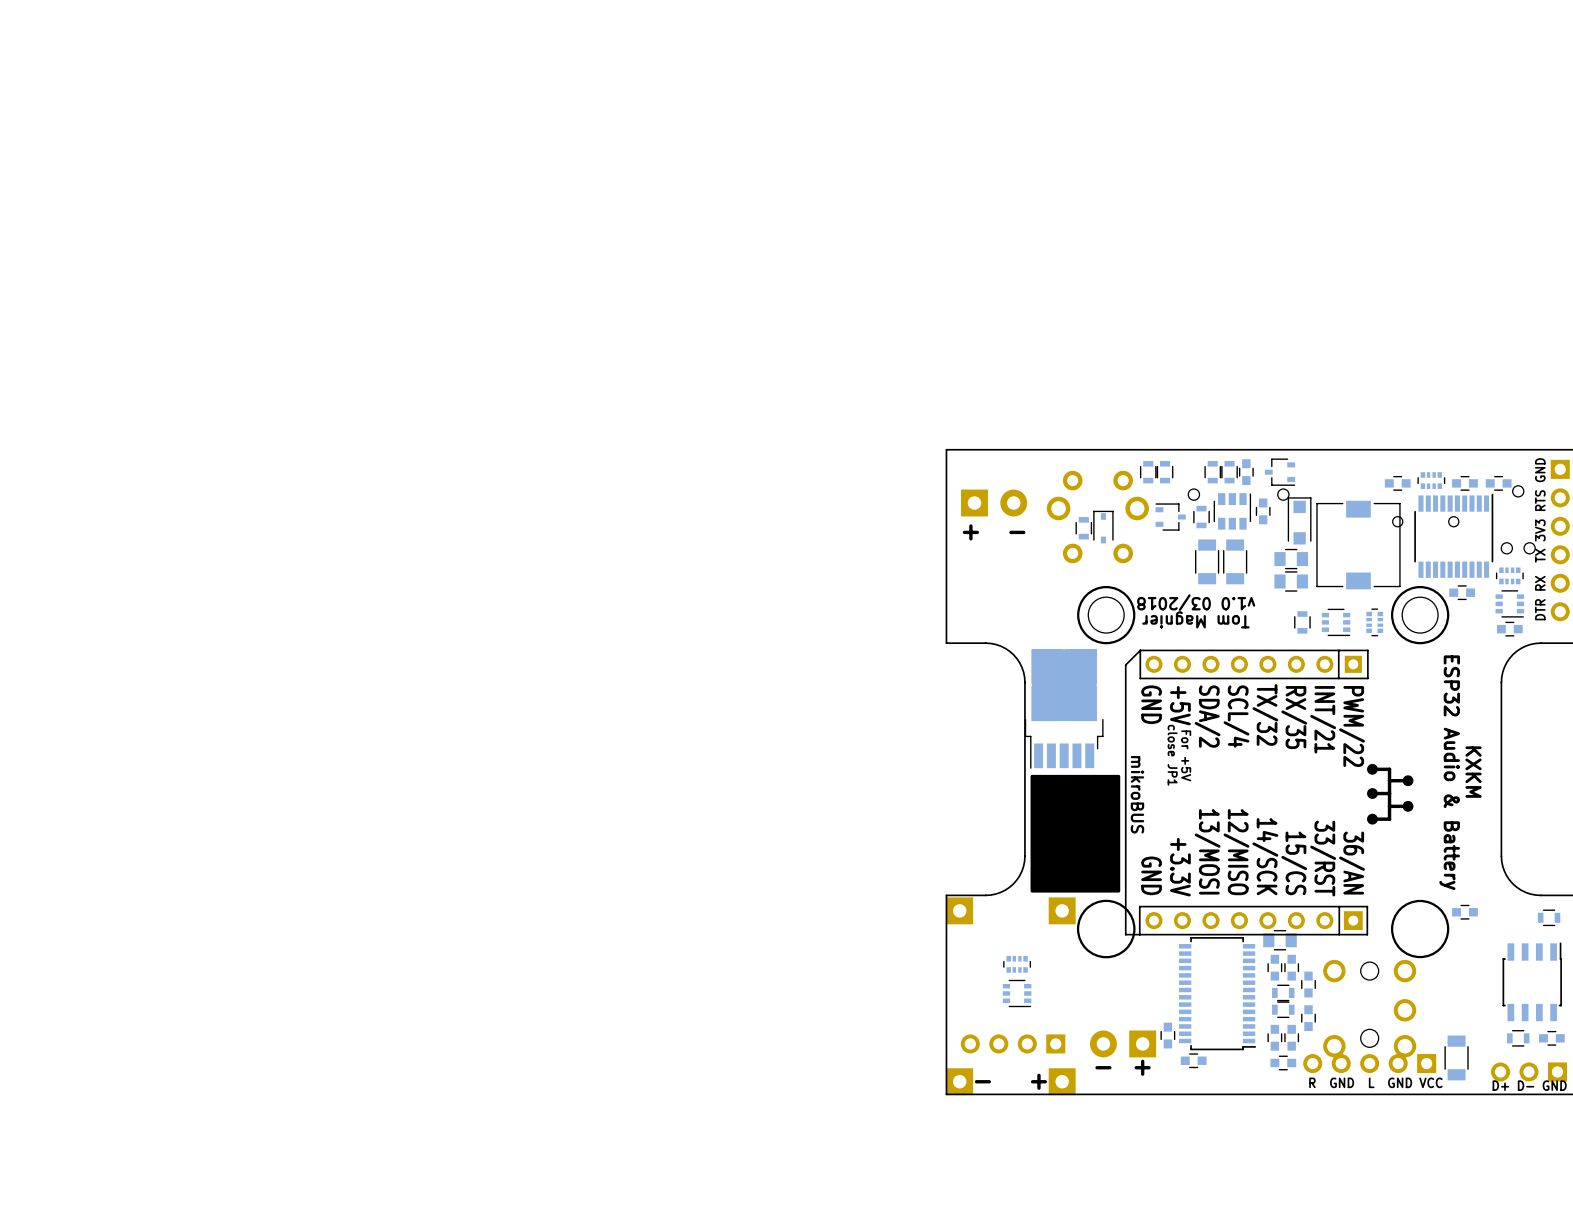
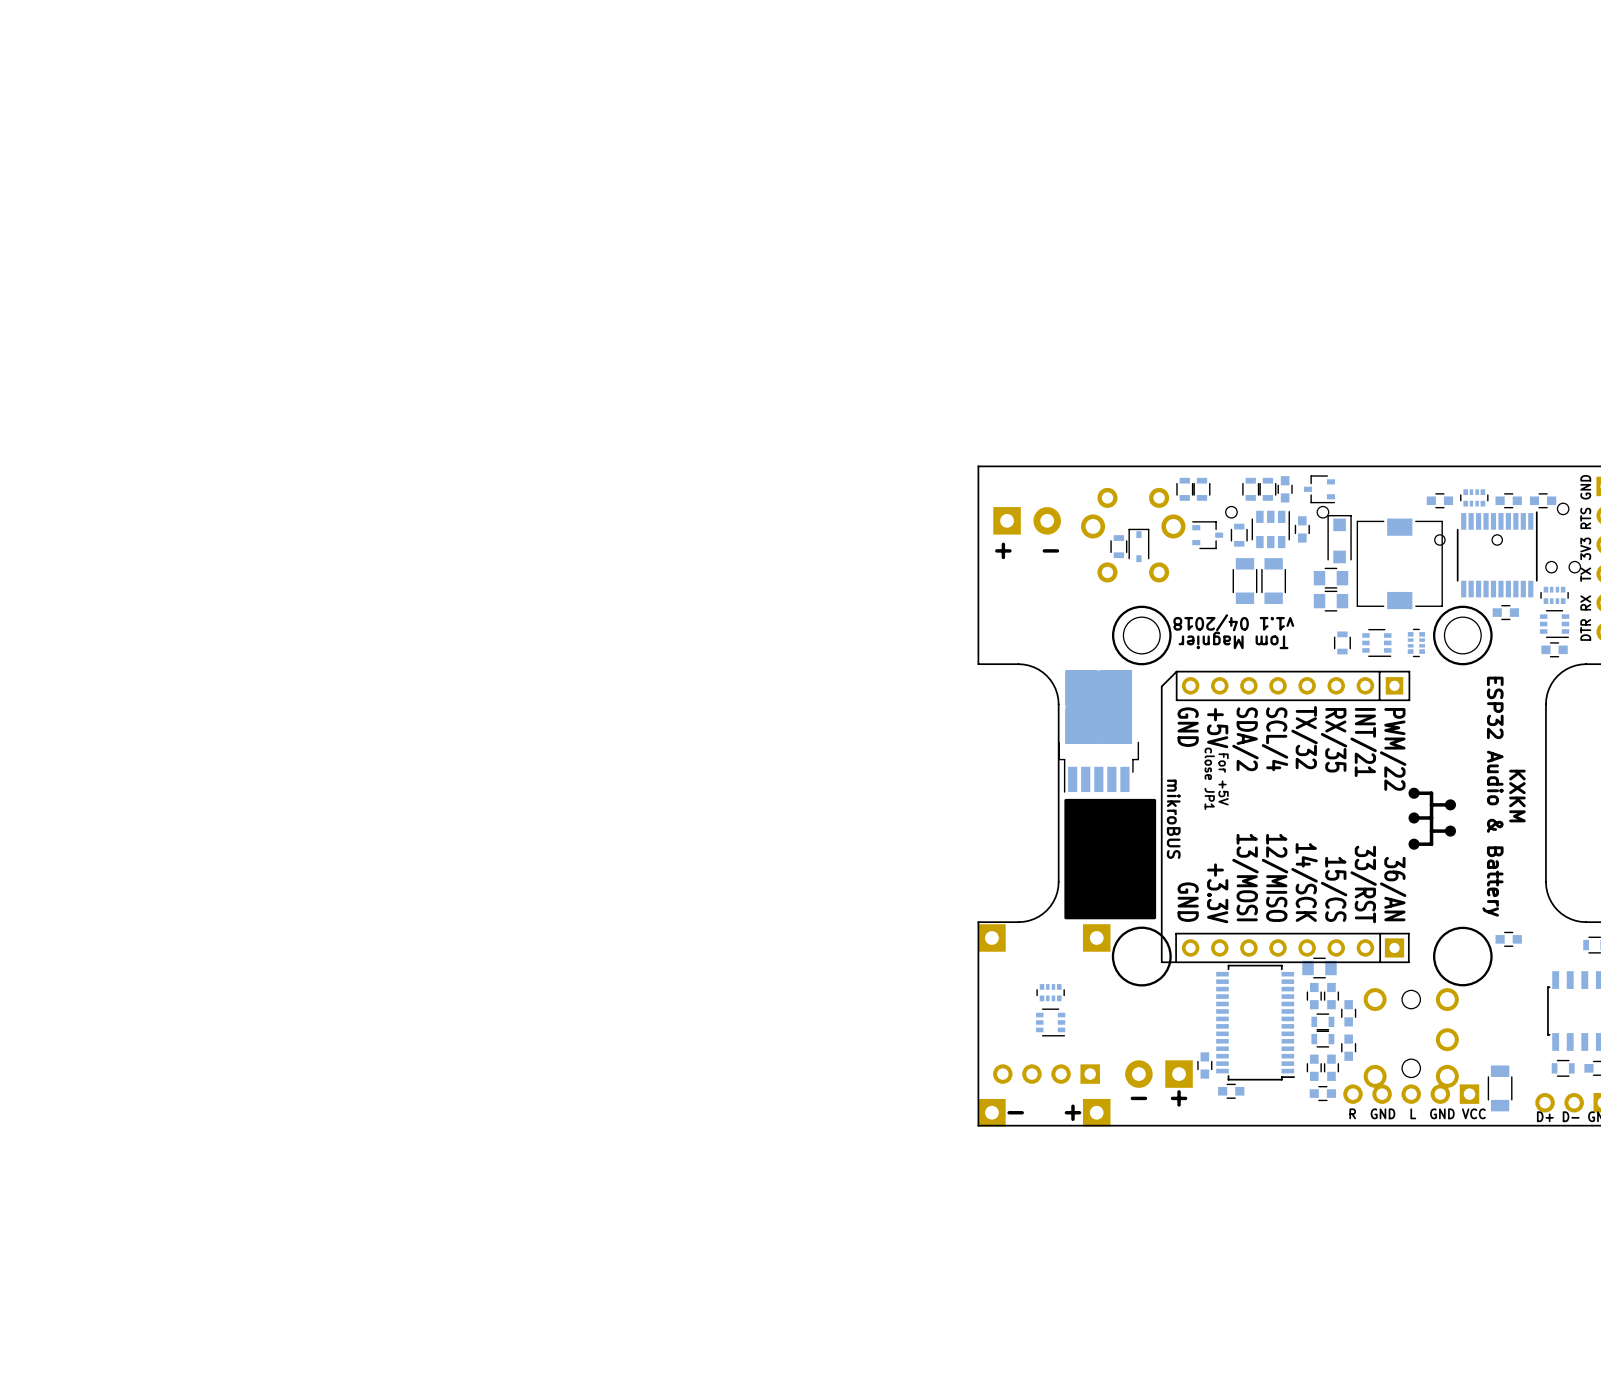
text: v1.0 03/2018 (1196, 602) -> v1.1 04/2018 (1233, 622)

